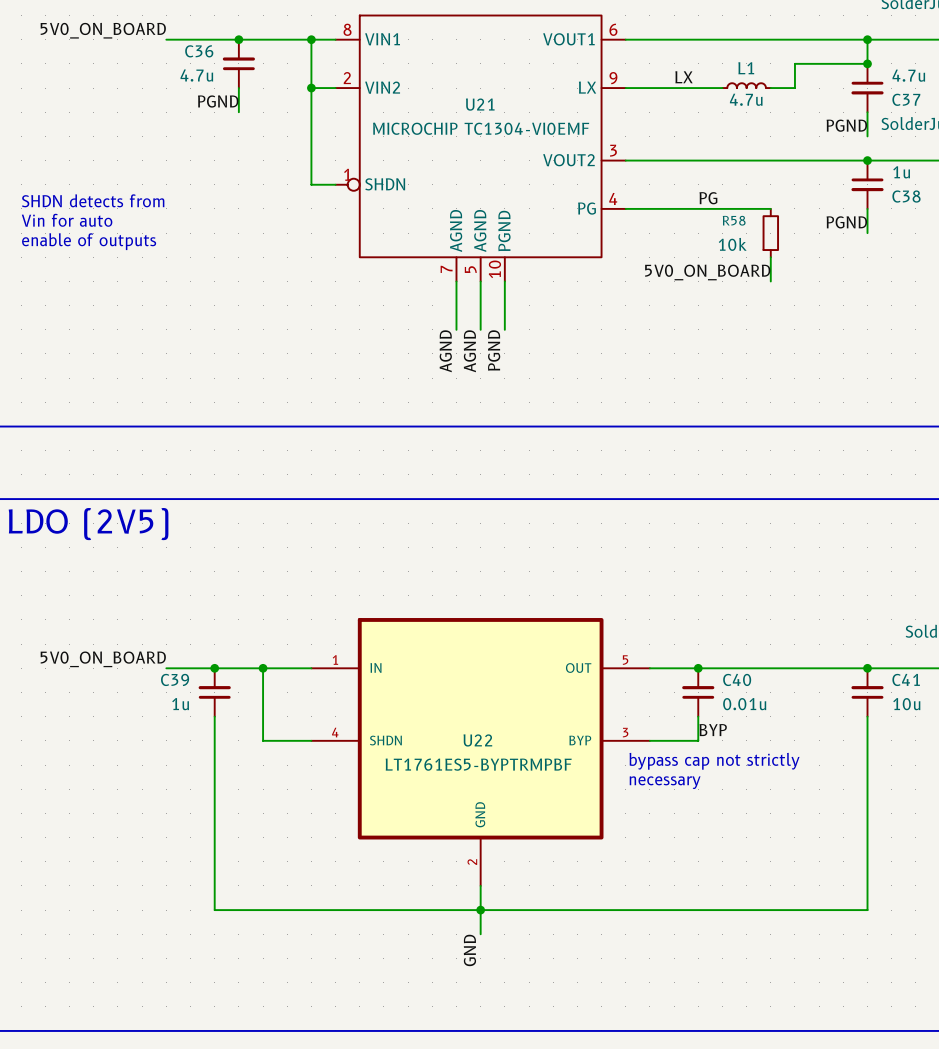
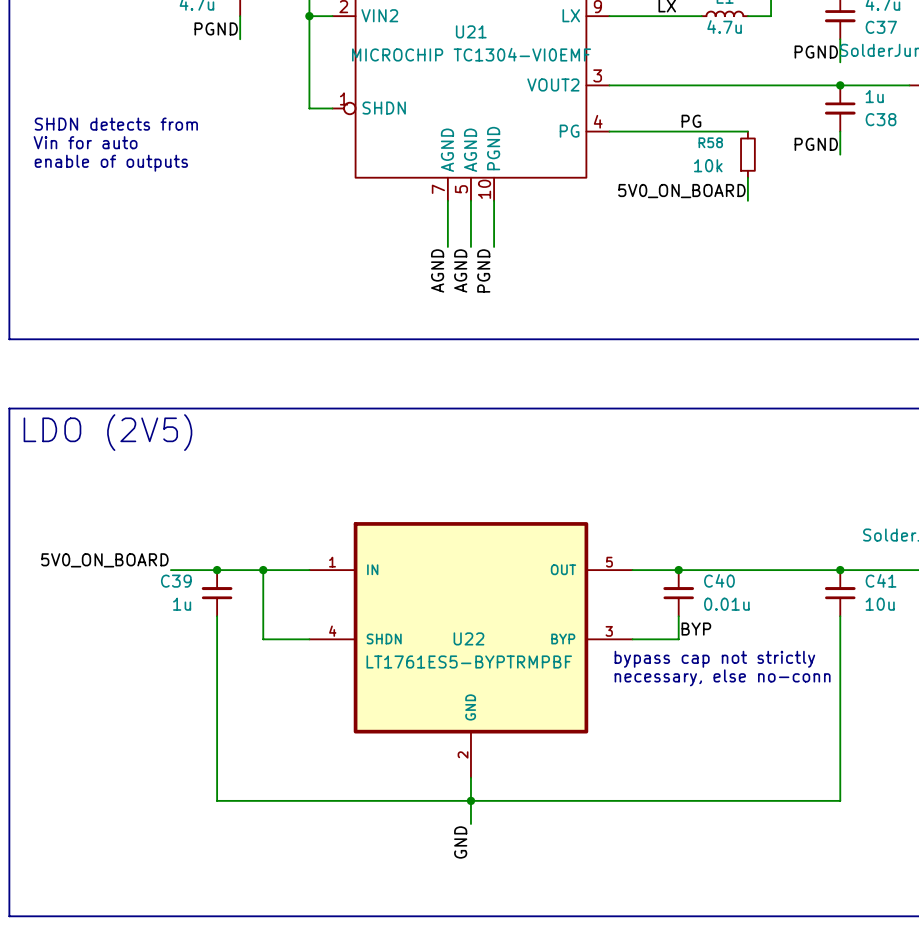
text: necessary (665, 782) -> necessary, else no-conn (722, 677)

